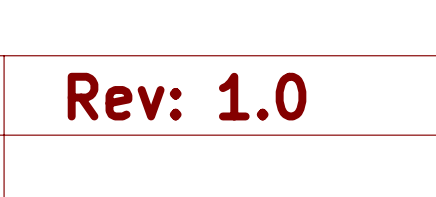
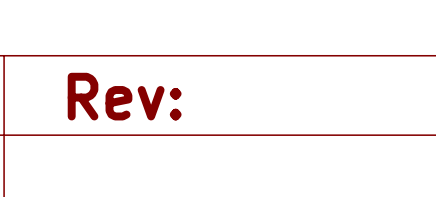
title block: Rev: 1.0 (187, 96) -> Rev: (124, 96)

